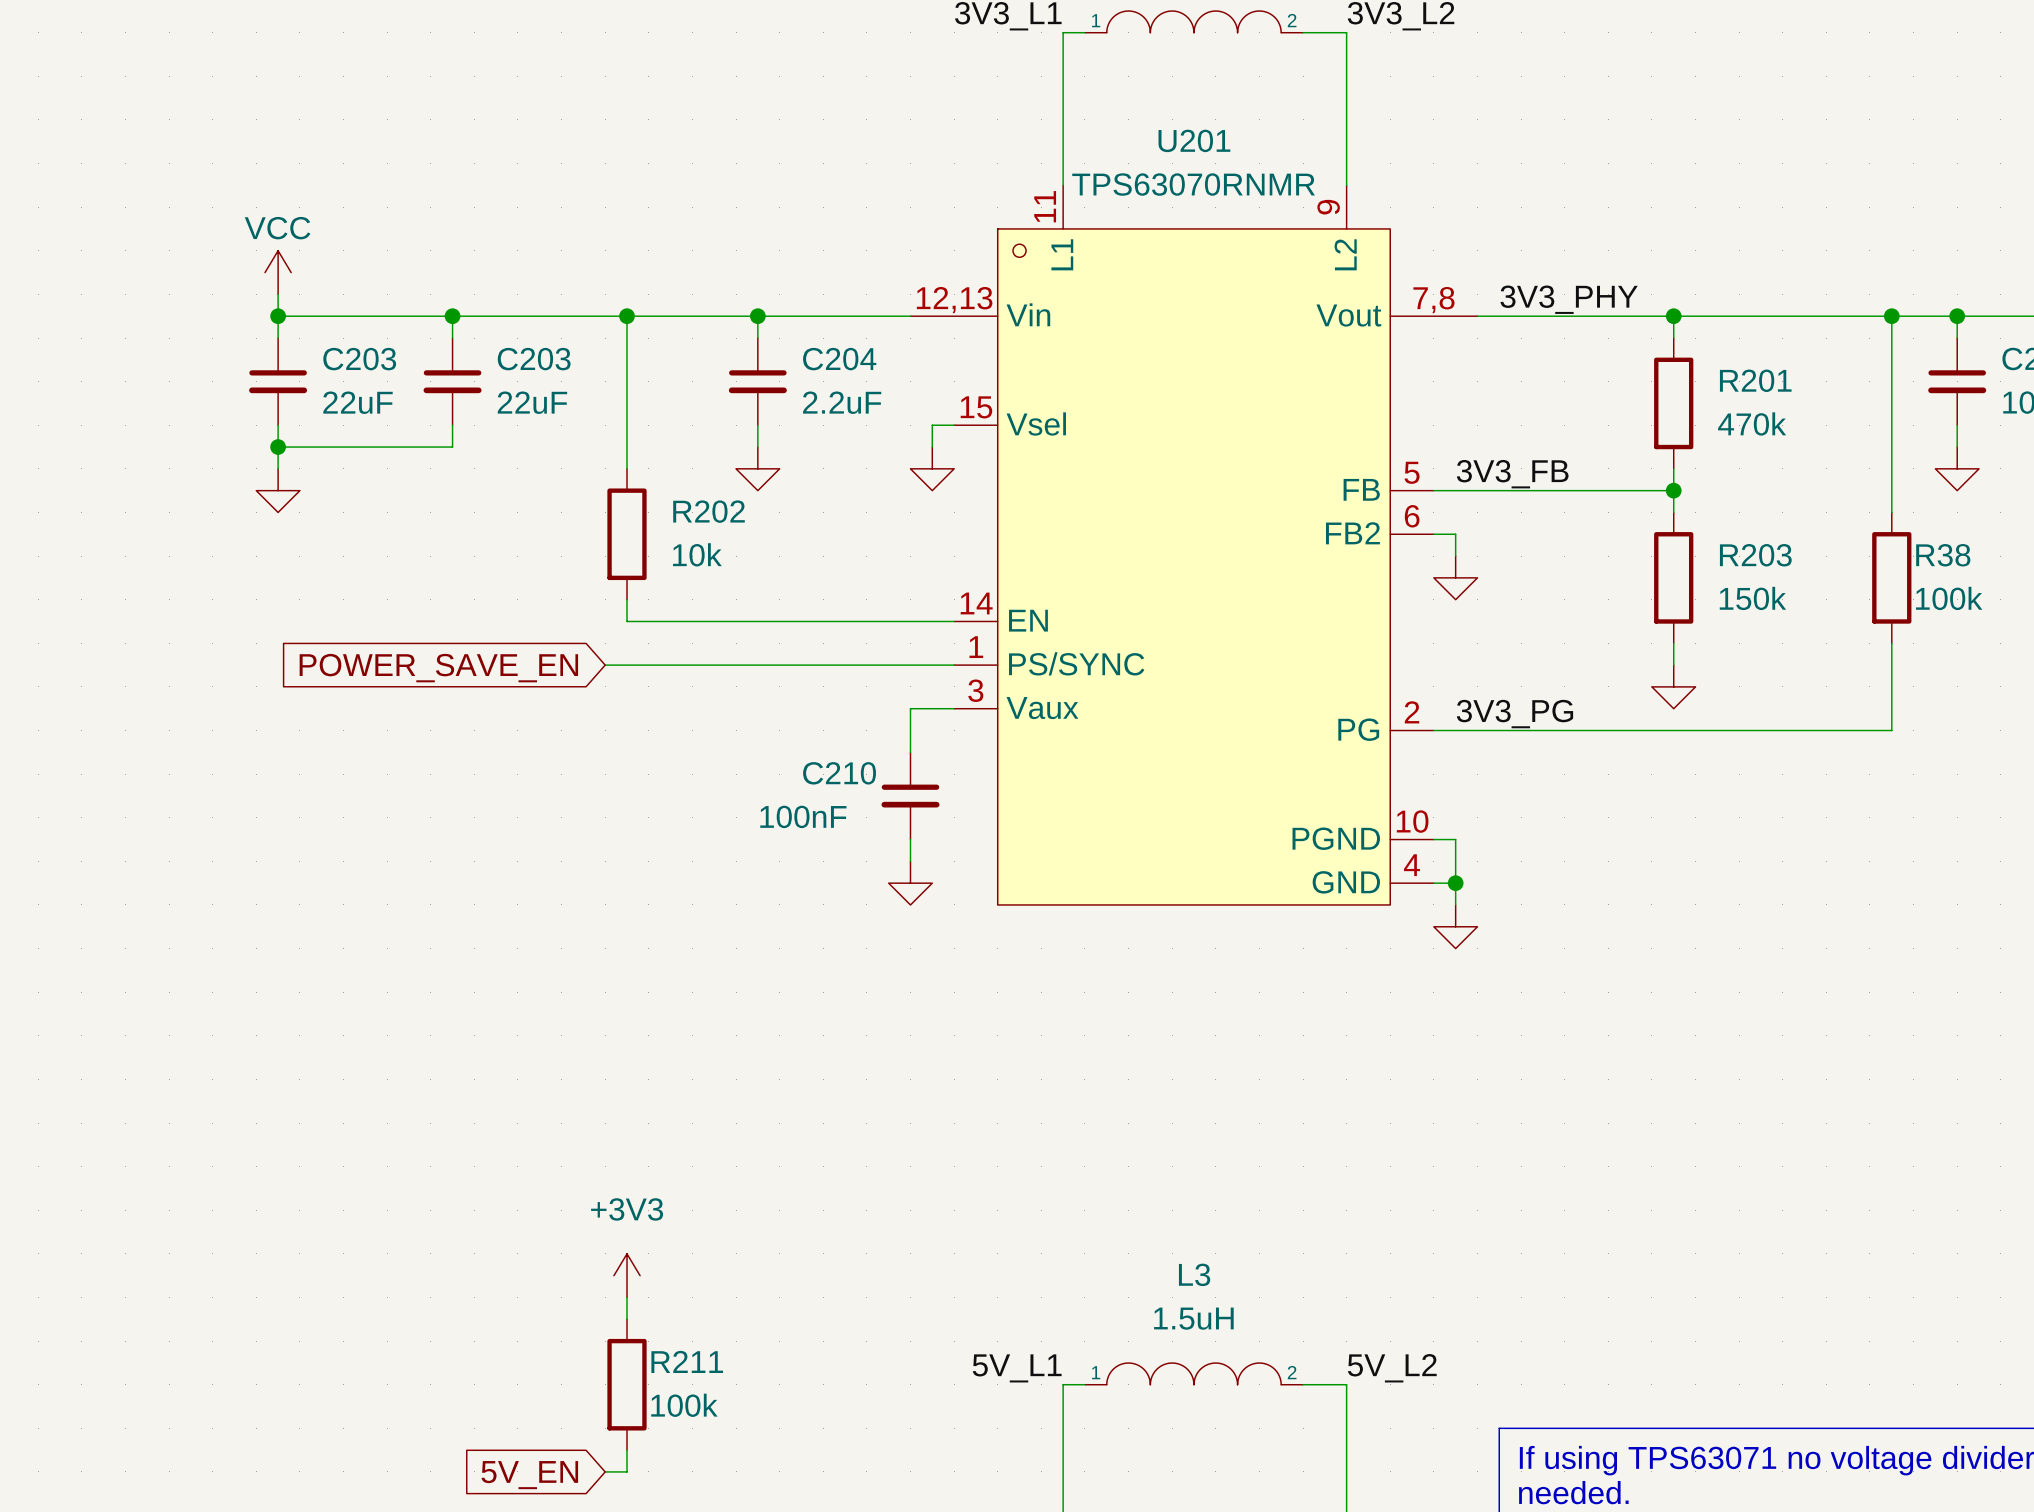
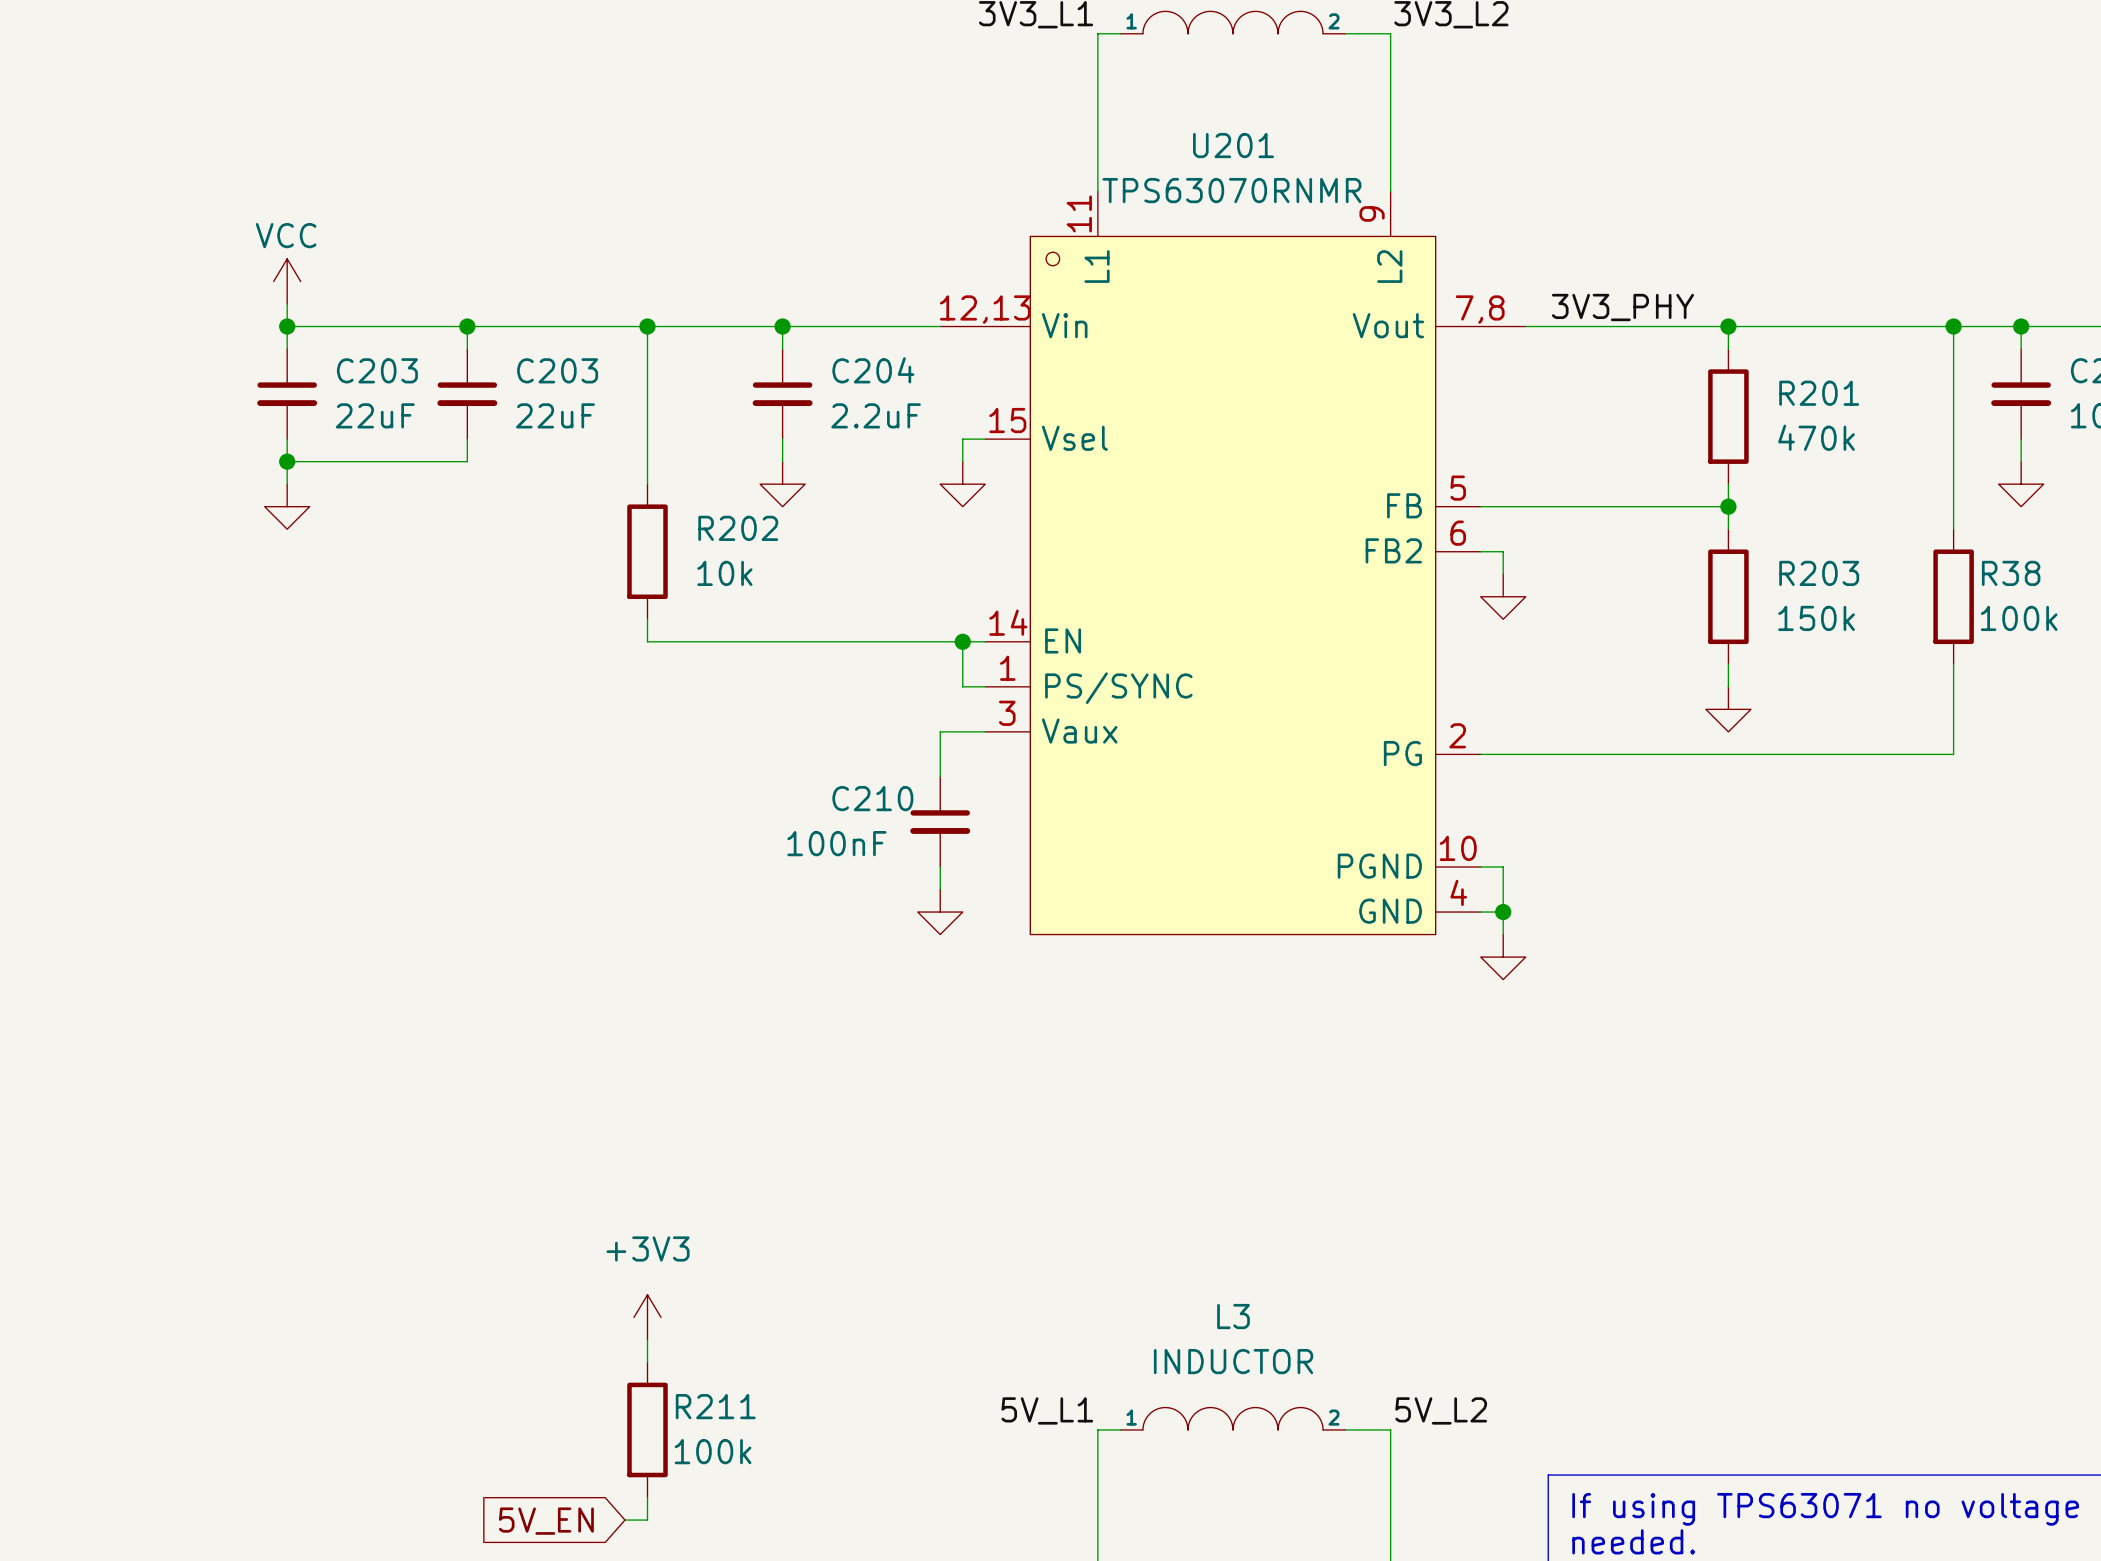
label: 3V3_FB (1512, 474) -> none
junction: none -> (962, 641)
wire: (605, 665) (932, 665) -> (962, 641) (962, 686)
global label: POWER_SAVE_EN (438, 668) -> none
label: 3V3_PG (1514, 714) -> none
L3 value: 1.5uH (1193, 1318) -> INDUCTOR (1233, 1361)

